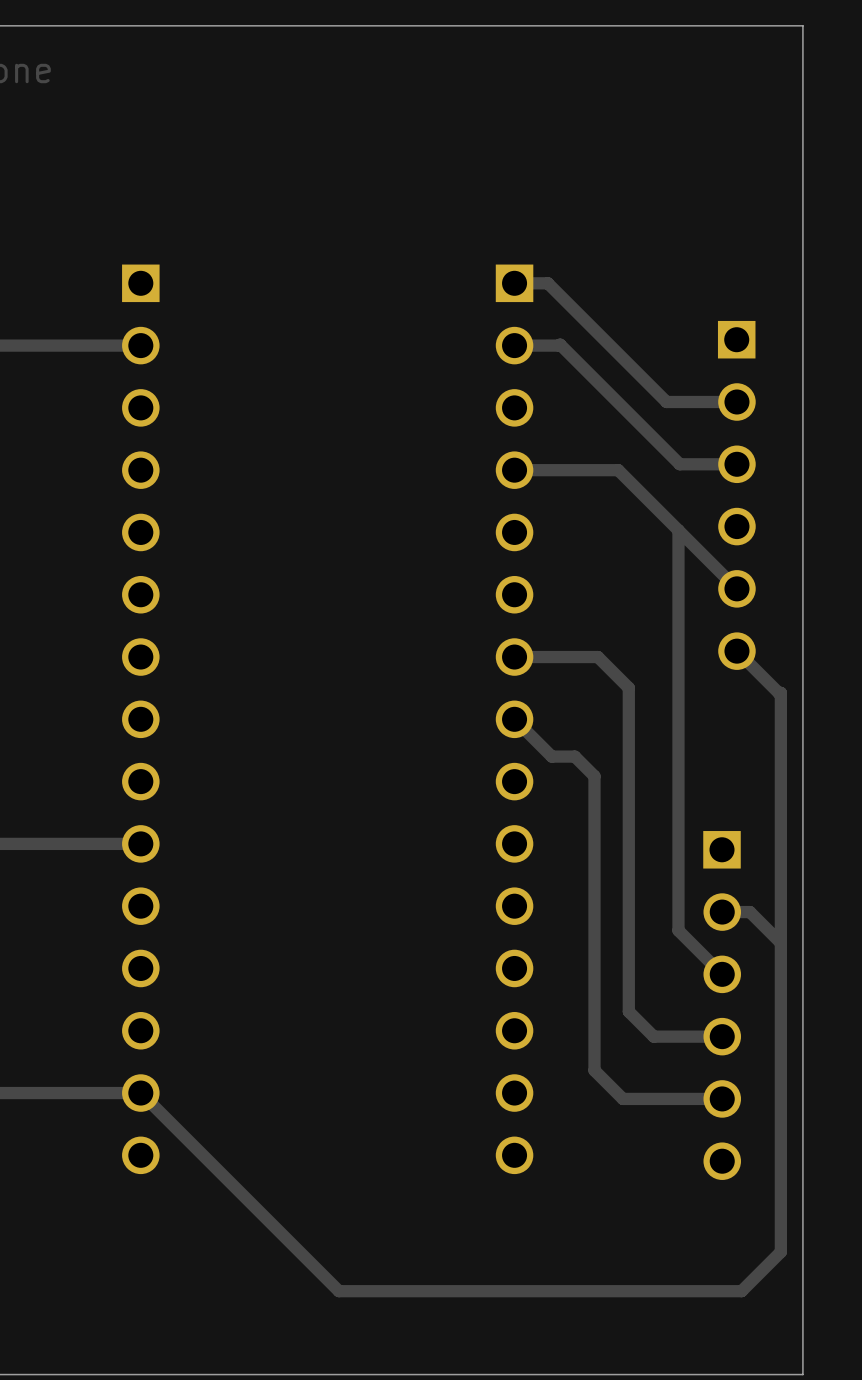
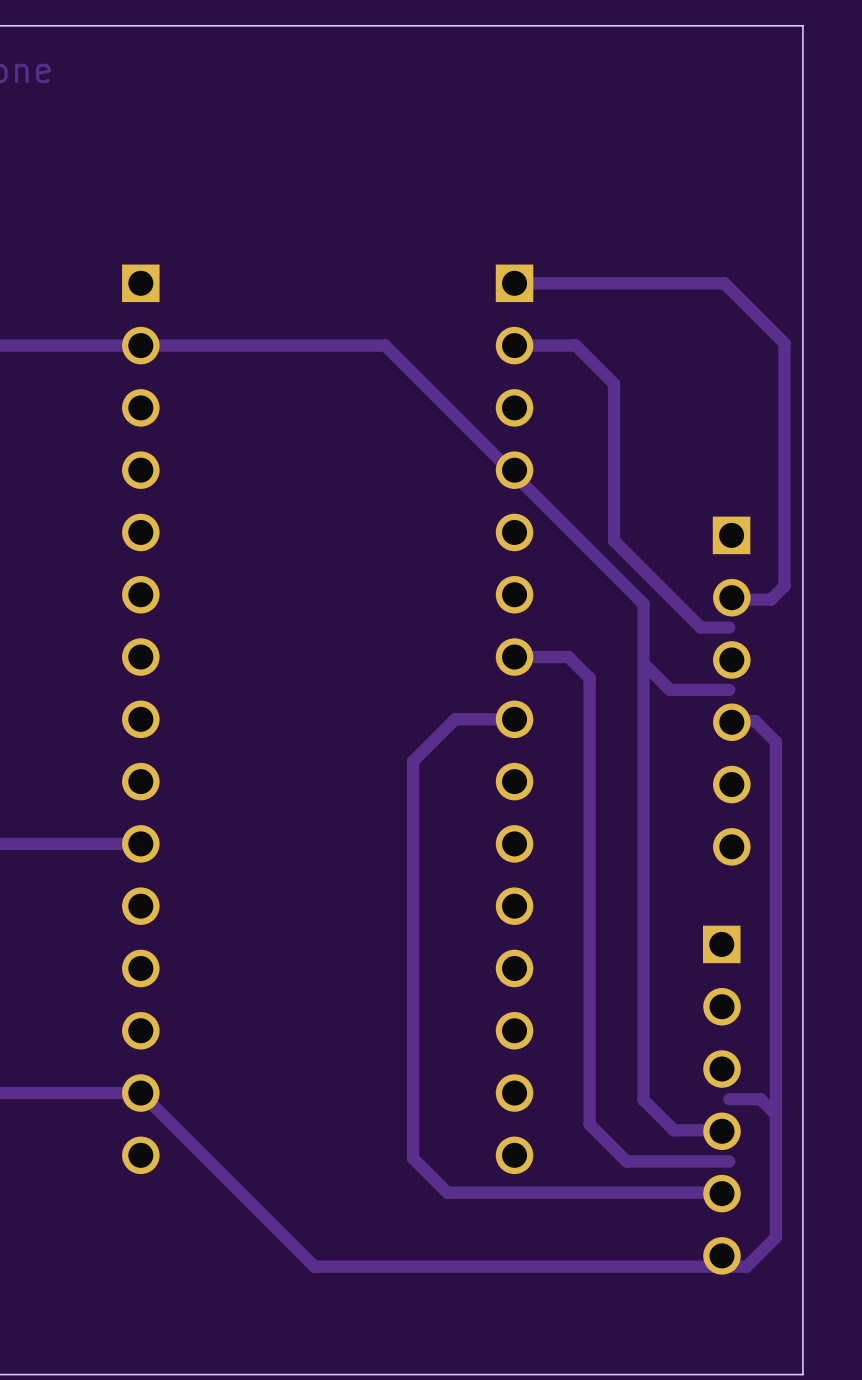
track: (547, 283) (666, 402) (736, 402) -> (547, 283) (724, 283) (784, 343) (784, 586) (771, 599) (731, 599)
track: none -> (140, 345) (385, 345) (643, 604) (643, 1099) (673, 1130) (729, 1130) (708, 1130)
track: (559, 345) (679, 464) (736, 464) -> (559, 345) (575, 345) (614, 383) (614, 540) (700, 627) (729, 627)
track: (514, 470) (618, 470) (736, 588) -> none
part: (736, 495) -> none
track: (678, 530) (678, 930) (722, 974) -> none
track: (736, 651) (778, 692) (780, 692) (780, 1251) (741, 1291) (338, 1291) (314, 1266) -> (729, 721) (755, 721) (775, 741) (775, 1237) (746, 1266) (314, 1266)
track: (568, 657) (597, 657) (628, 687) (628, 1011) (653, 1036) (722, 1036) -> (568, 657) (589, 678) (589, 1124) (626, 1161) (729, 1161) (658, 1161)
track: none -> (646, 666) (670, 689) (729, 689)
part: none -> (731, 691)
track: (514, 719) (551, 756) (574, 756) (594, 776) (594, 1070) (622, 1098) (722, 1098) -> (514, 719) (455, 719) (413, 761) (413, 1158) (447, 1192) (729, 1192)
track: (722, 912) (749, 912) (780, 942) -> none
part position: (722, 1005) -> (721, 1100)
track: none -> (729, 1099) (760, 1099) (775, 1114)

